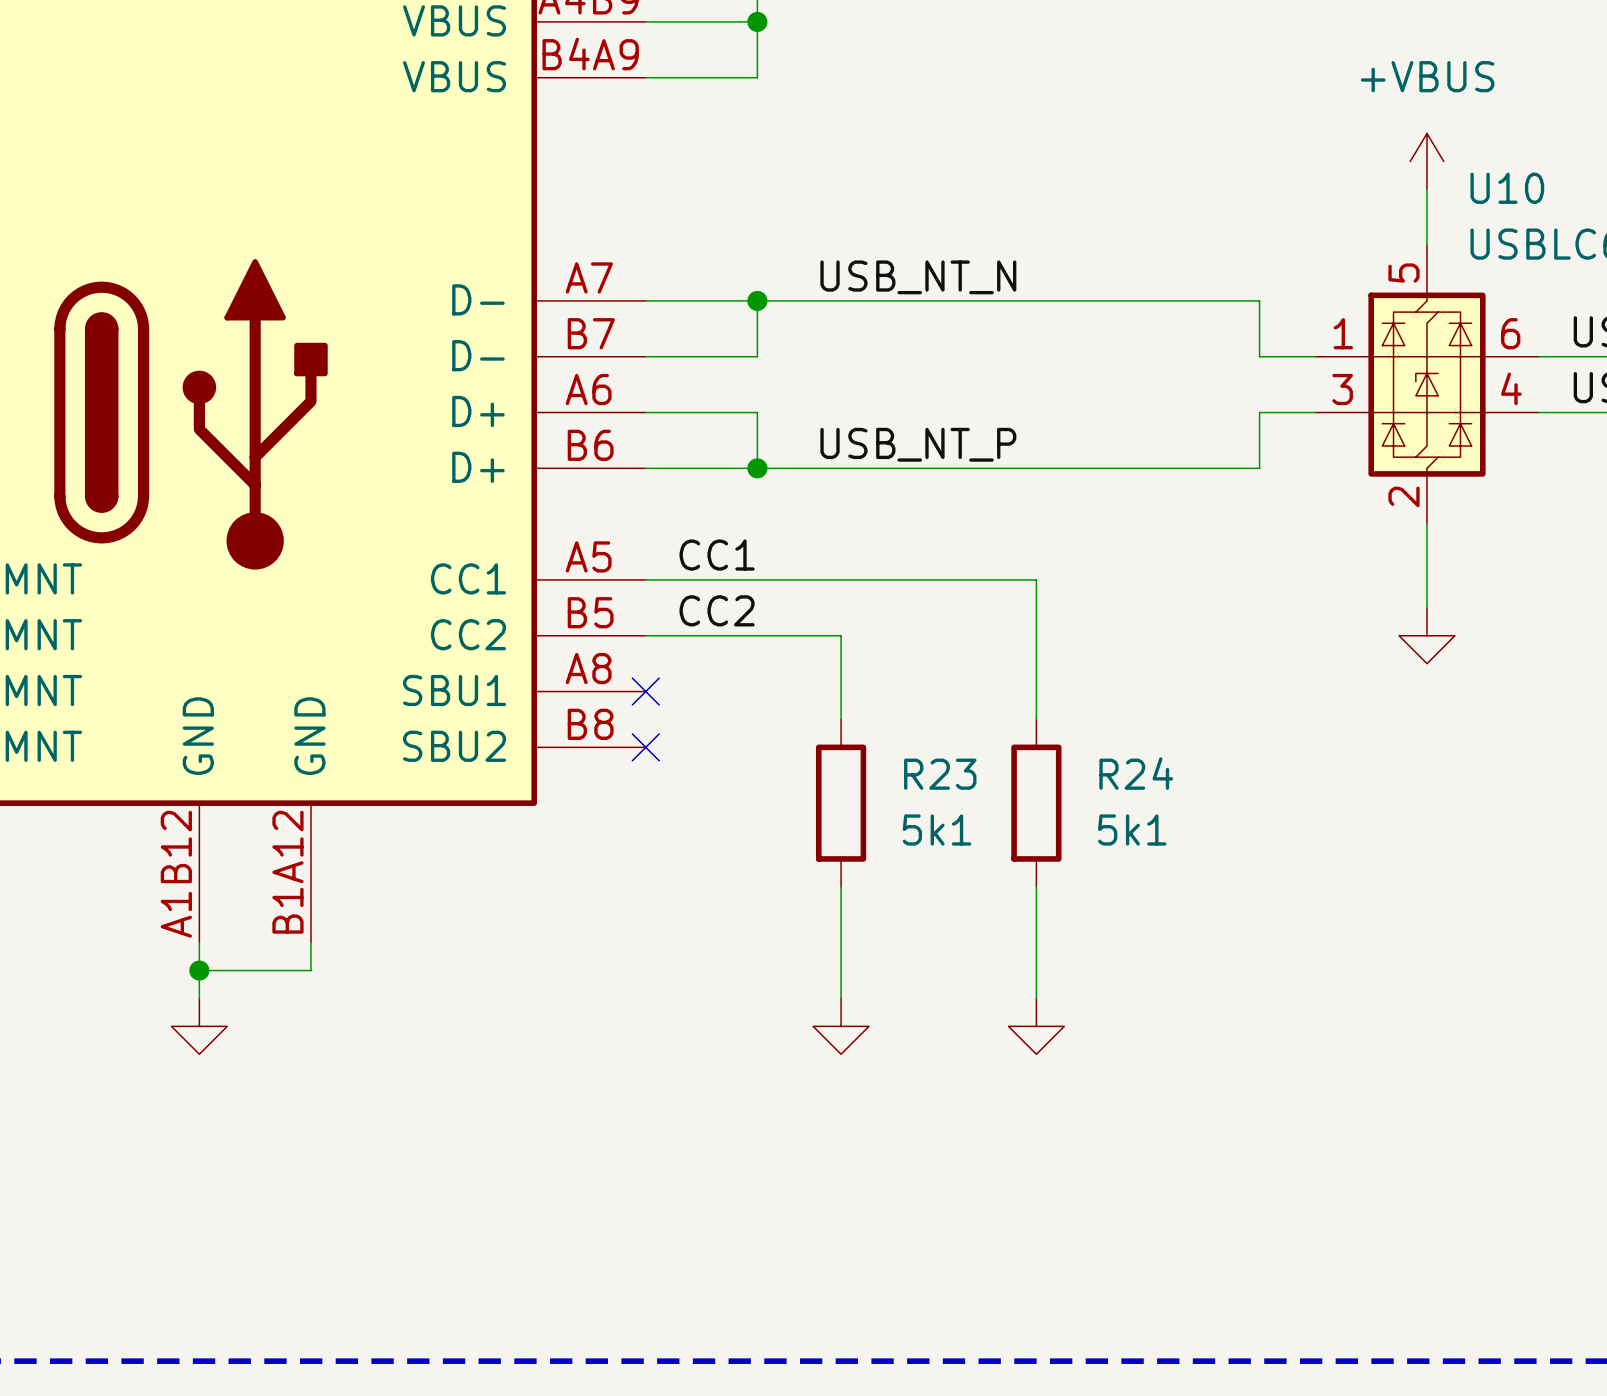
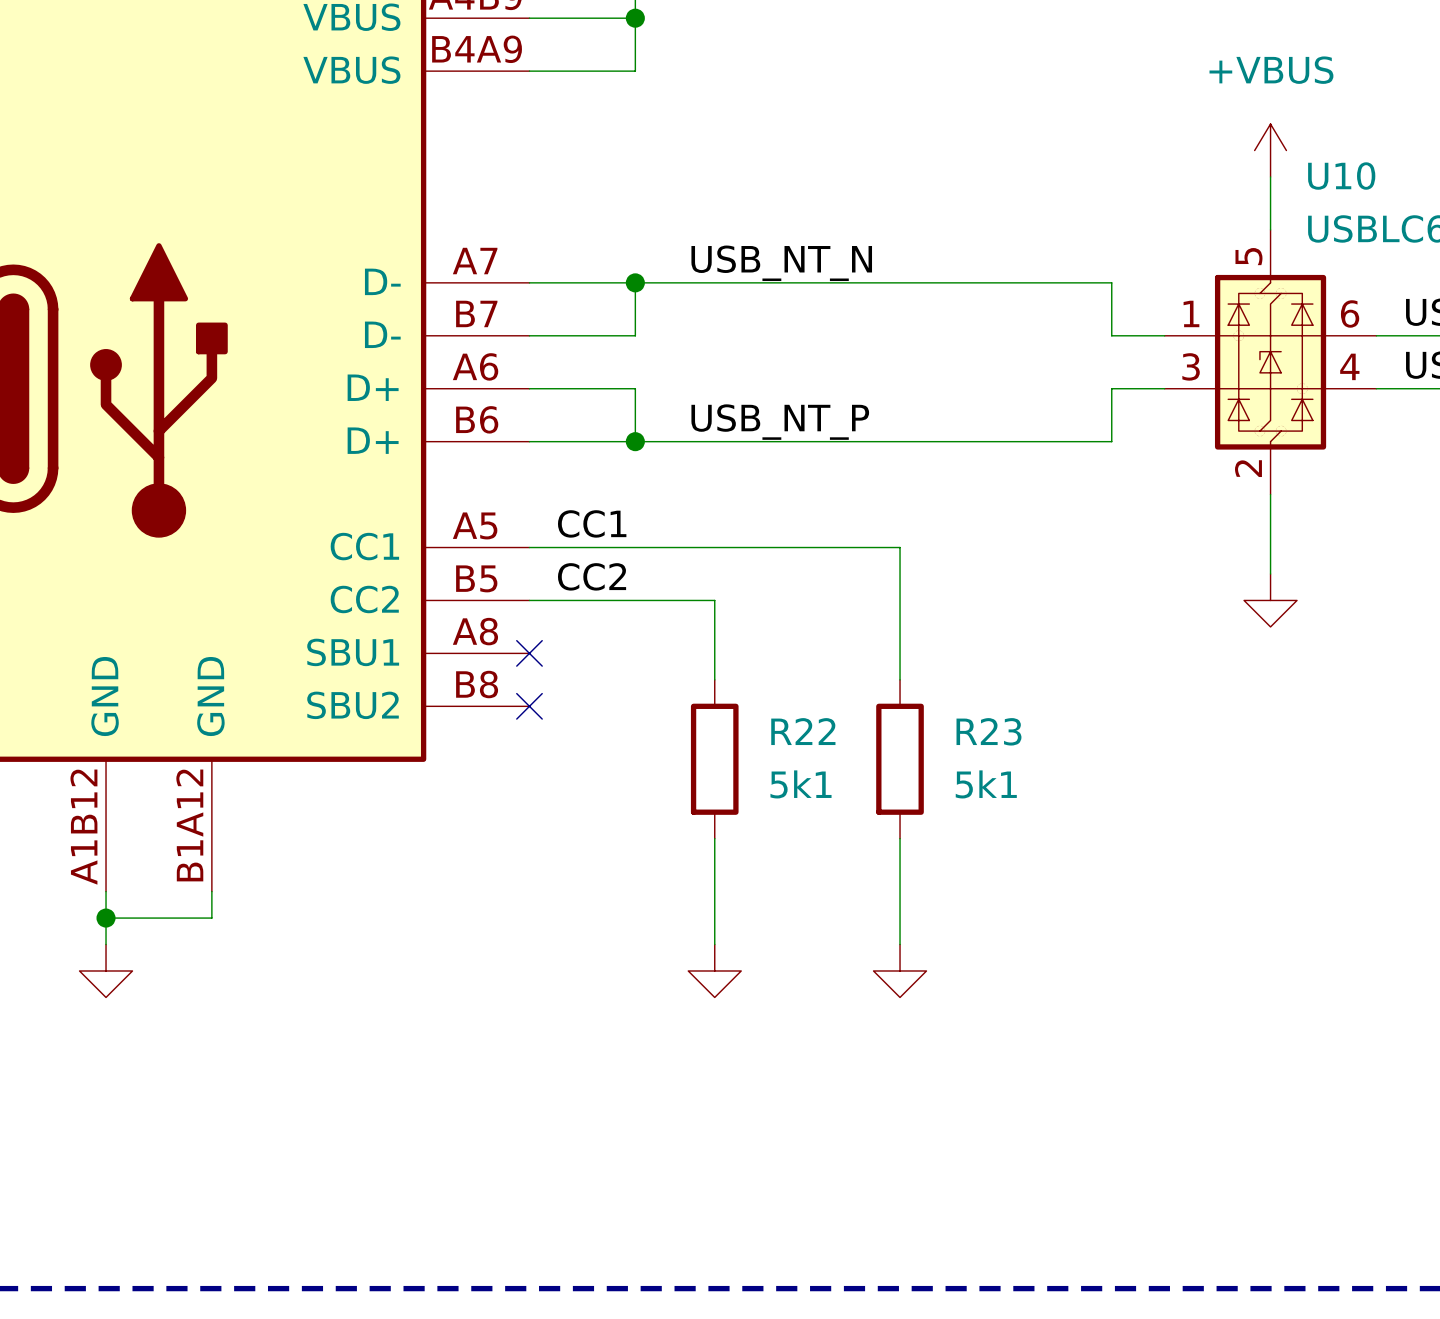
R24 name: R24 (1136, 773) -> R23 (988, 731)
R23 name: R23 (940, 774) -> R22 (803, 731)

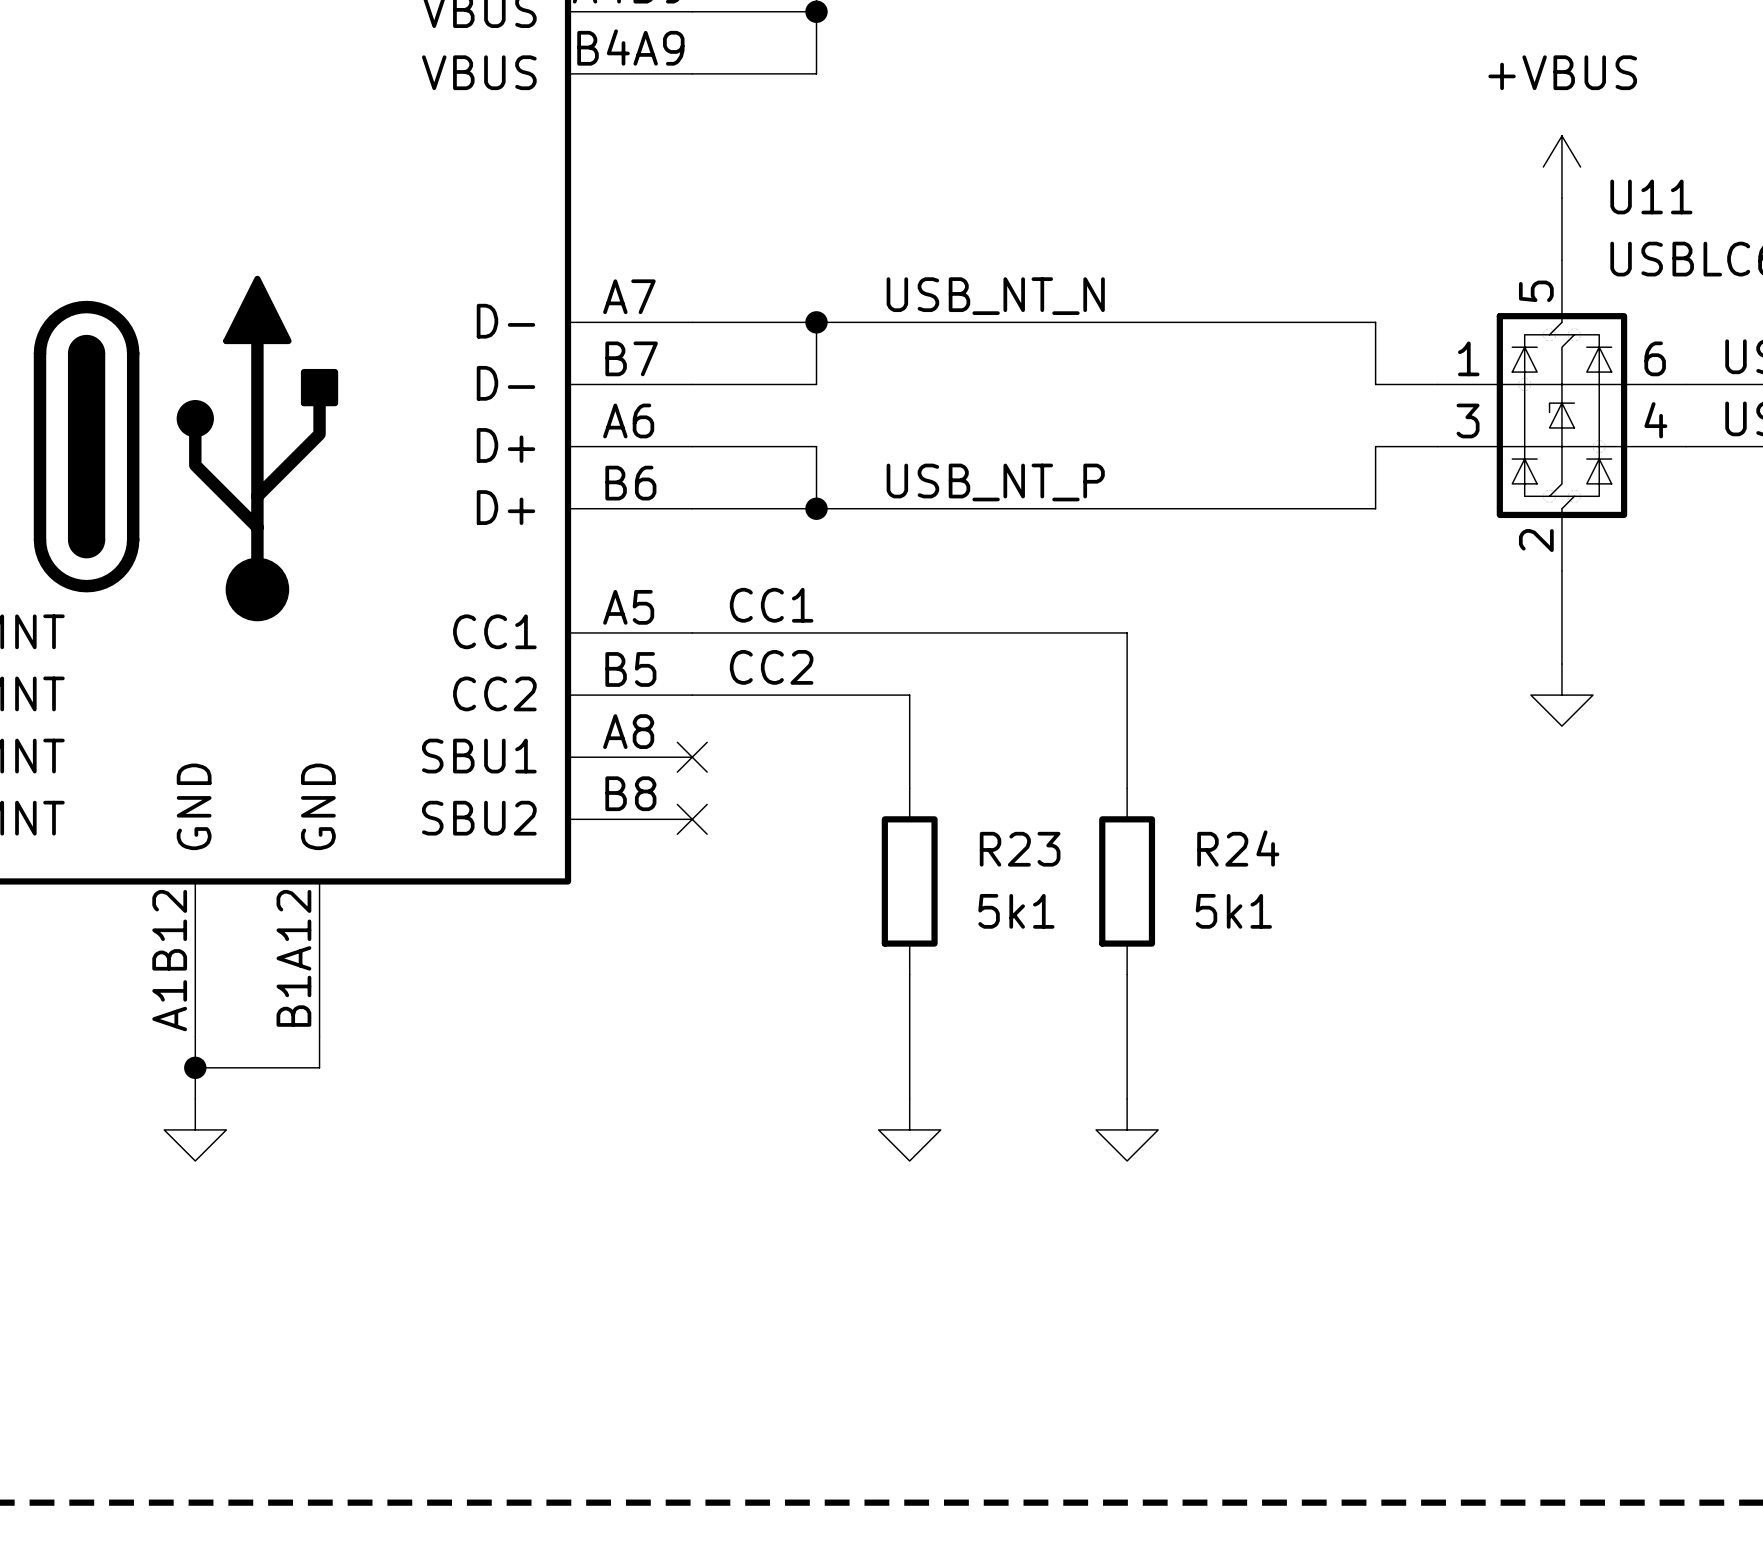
U10 name: U10 (1341, 176) -> U11 (1651, 196)
R22 name: R22 (803, 731) -> R23 (1020, 849)
R23 name: R23 (988, 731) -> R24 (1238, 848)

